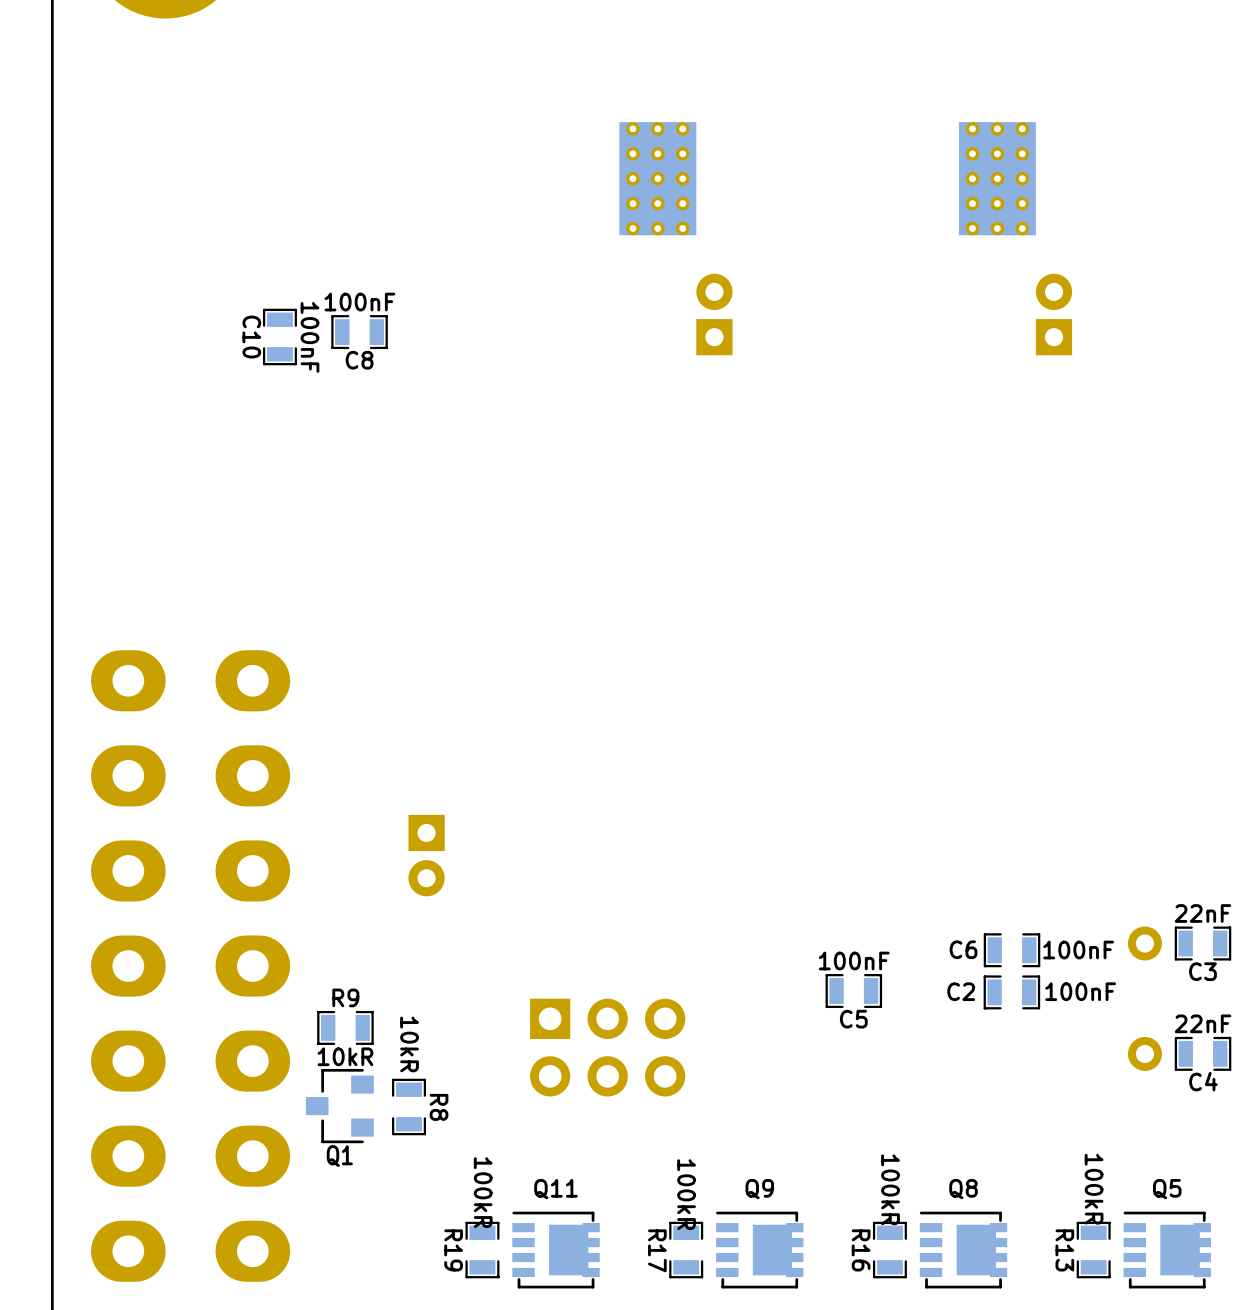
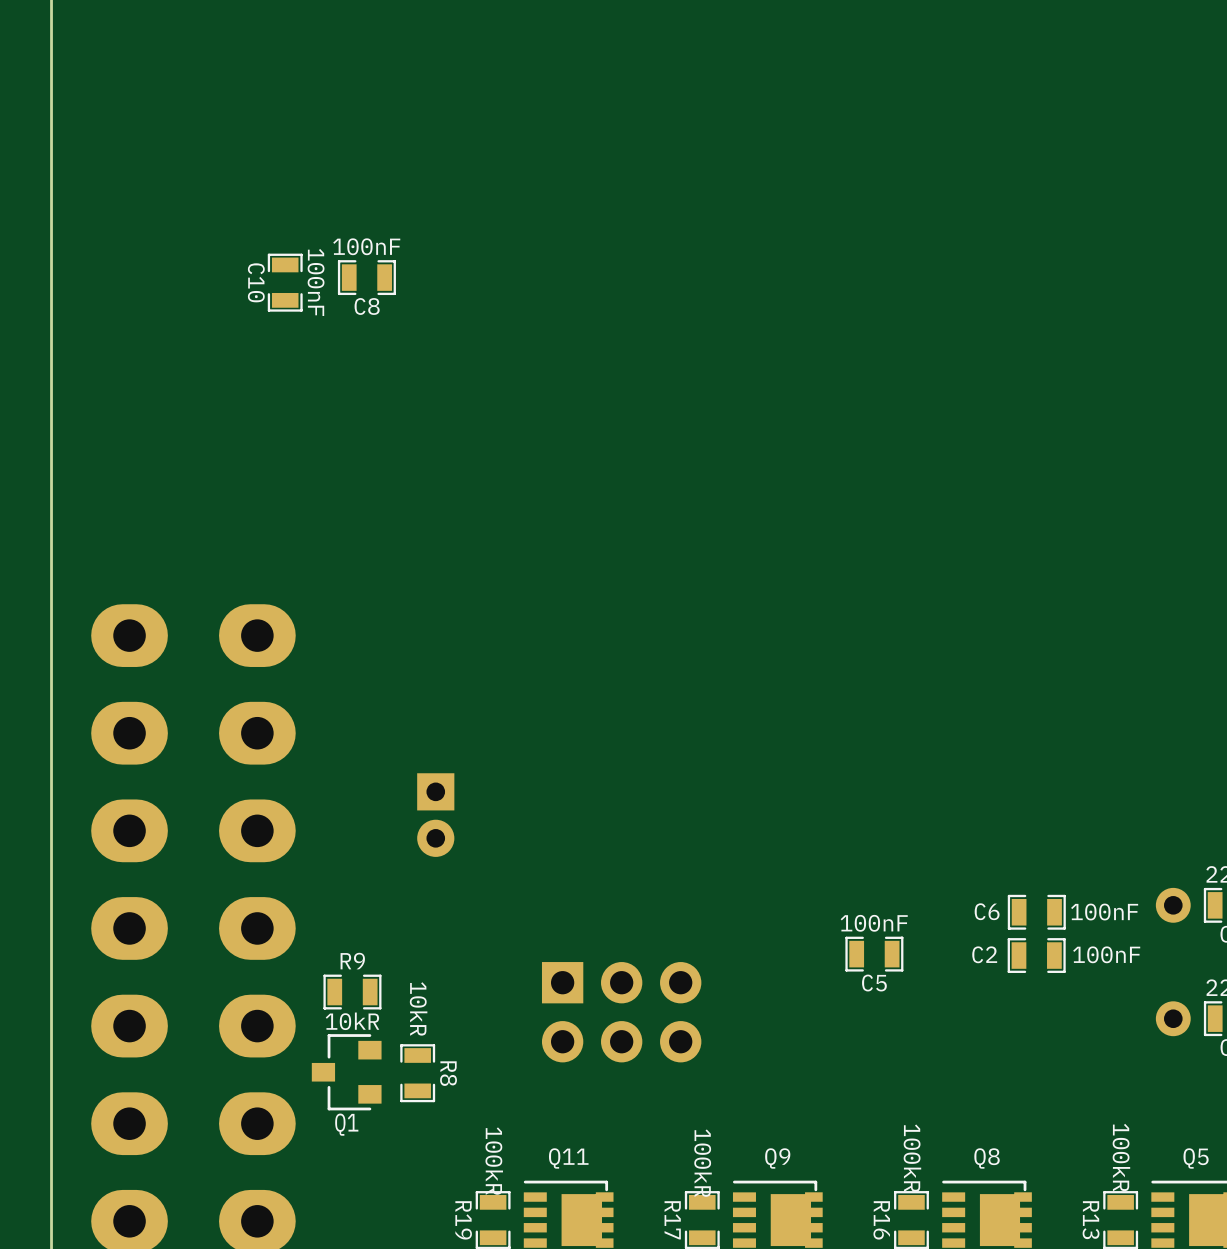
part: (657, 178) -> none
part: (997, 178) -> none
part: (714, 314) -> none
part: (1054, 314) -> none

